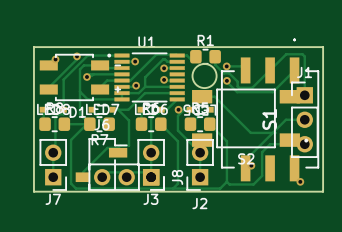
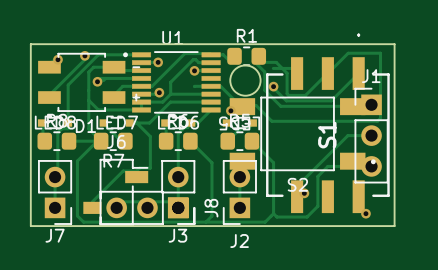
track: (302, 54) (304, 56) (304, 95) -> (368, 53) (380, 53) (380, 118) (377, 121) (271, 121) (256, 105) (239, 105) (220, 86) (211, 86)
track: (215, 56) (215, 64) (223, 73) (229, 73) (237, 81) -> (363, 106) (280, 106) (264, 90) (264, 72) (255, 62) (276, 62) (287, 73) (287, 87)
via: (226, 66) -> none
via: (164, 79) -> none
track: (202, 96) (214, 96) (250, 132) (275, 132) -> none
via position: (178, 109) -> (230, 110)
track: (184, 109) (177, 115) (177, 130) (200, 152) -> none

